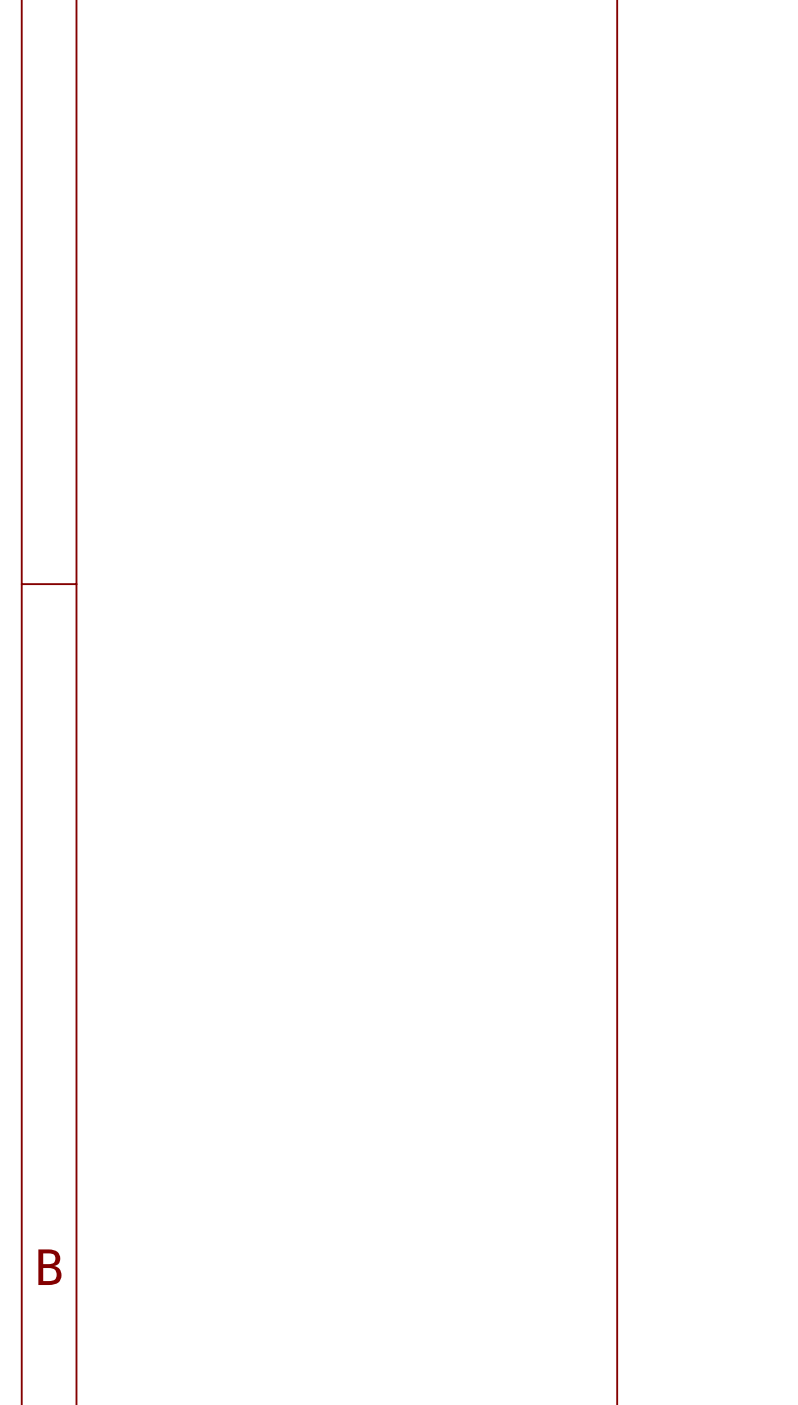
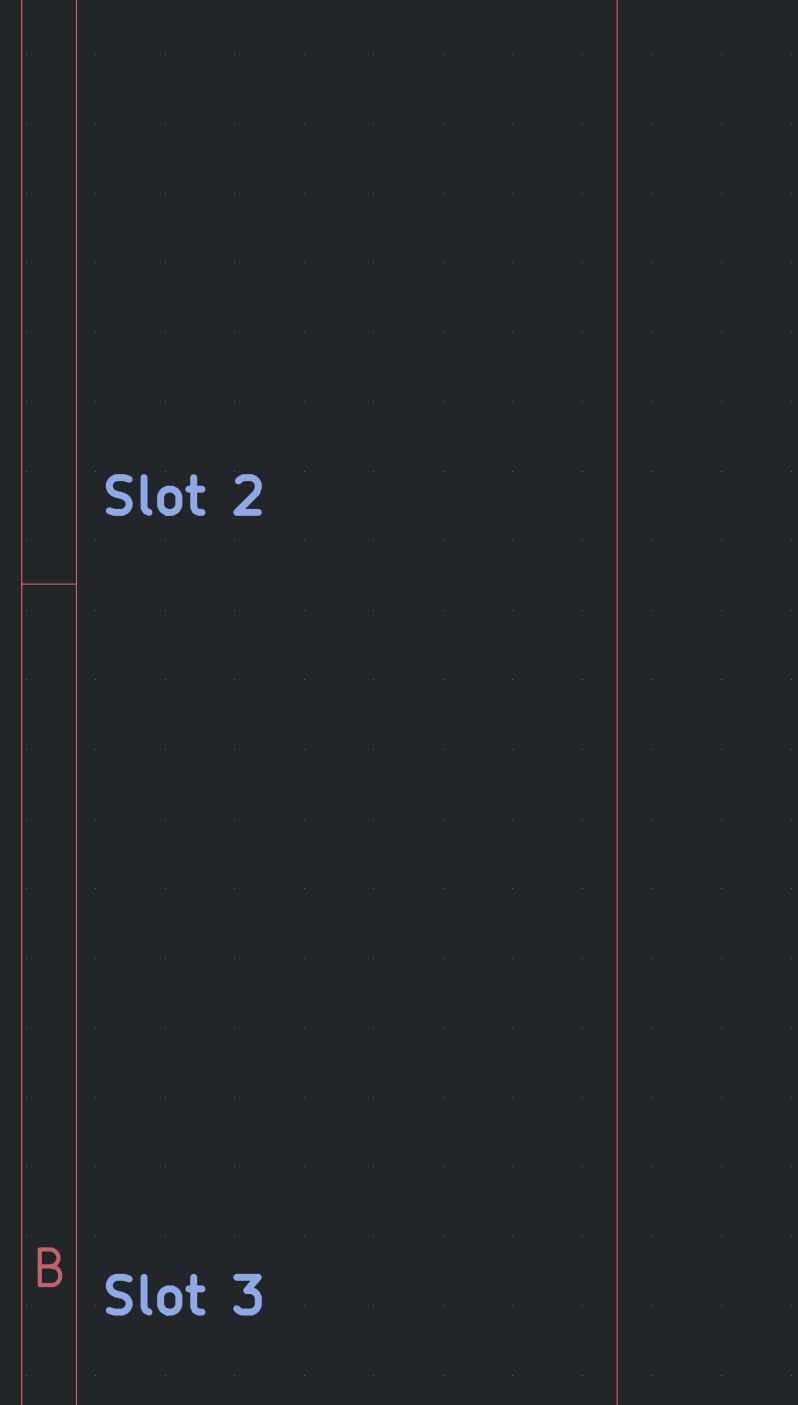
text: none -> Slot 2 (183, 495)
text: none -> Slot 3 (183, 1294)

